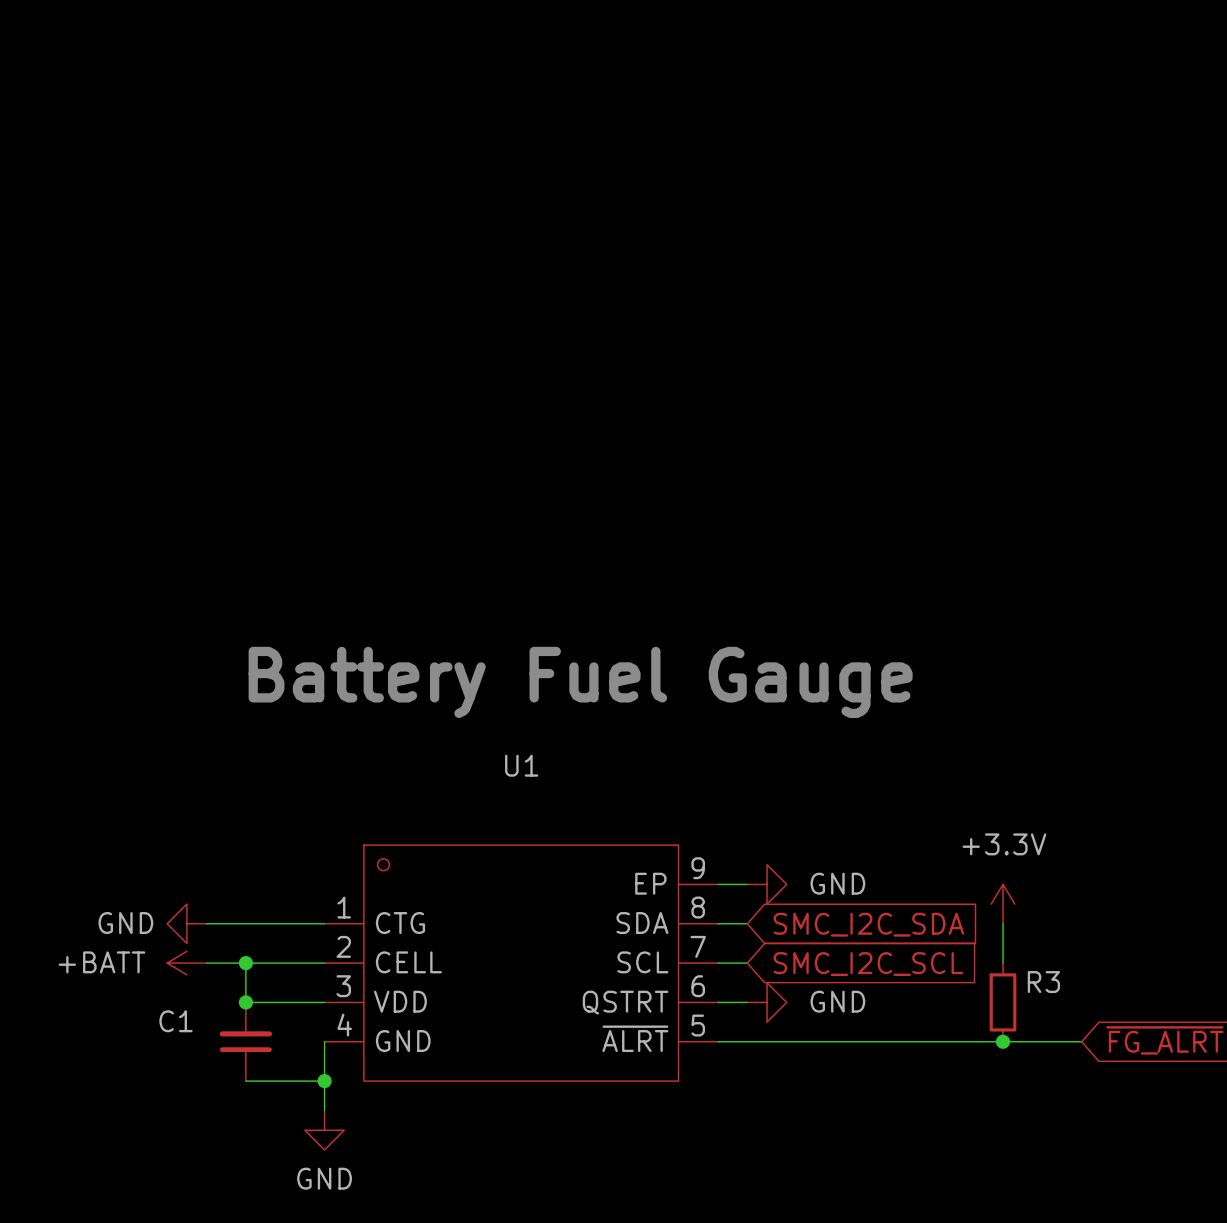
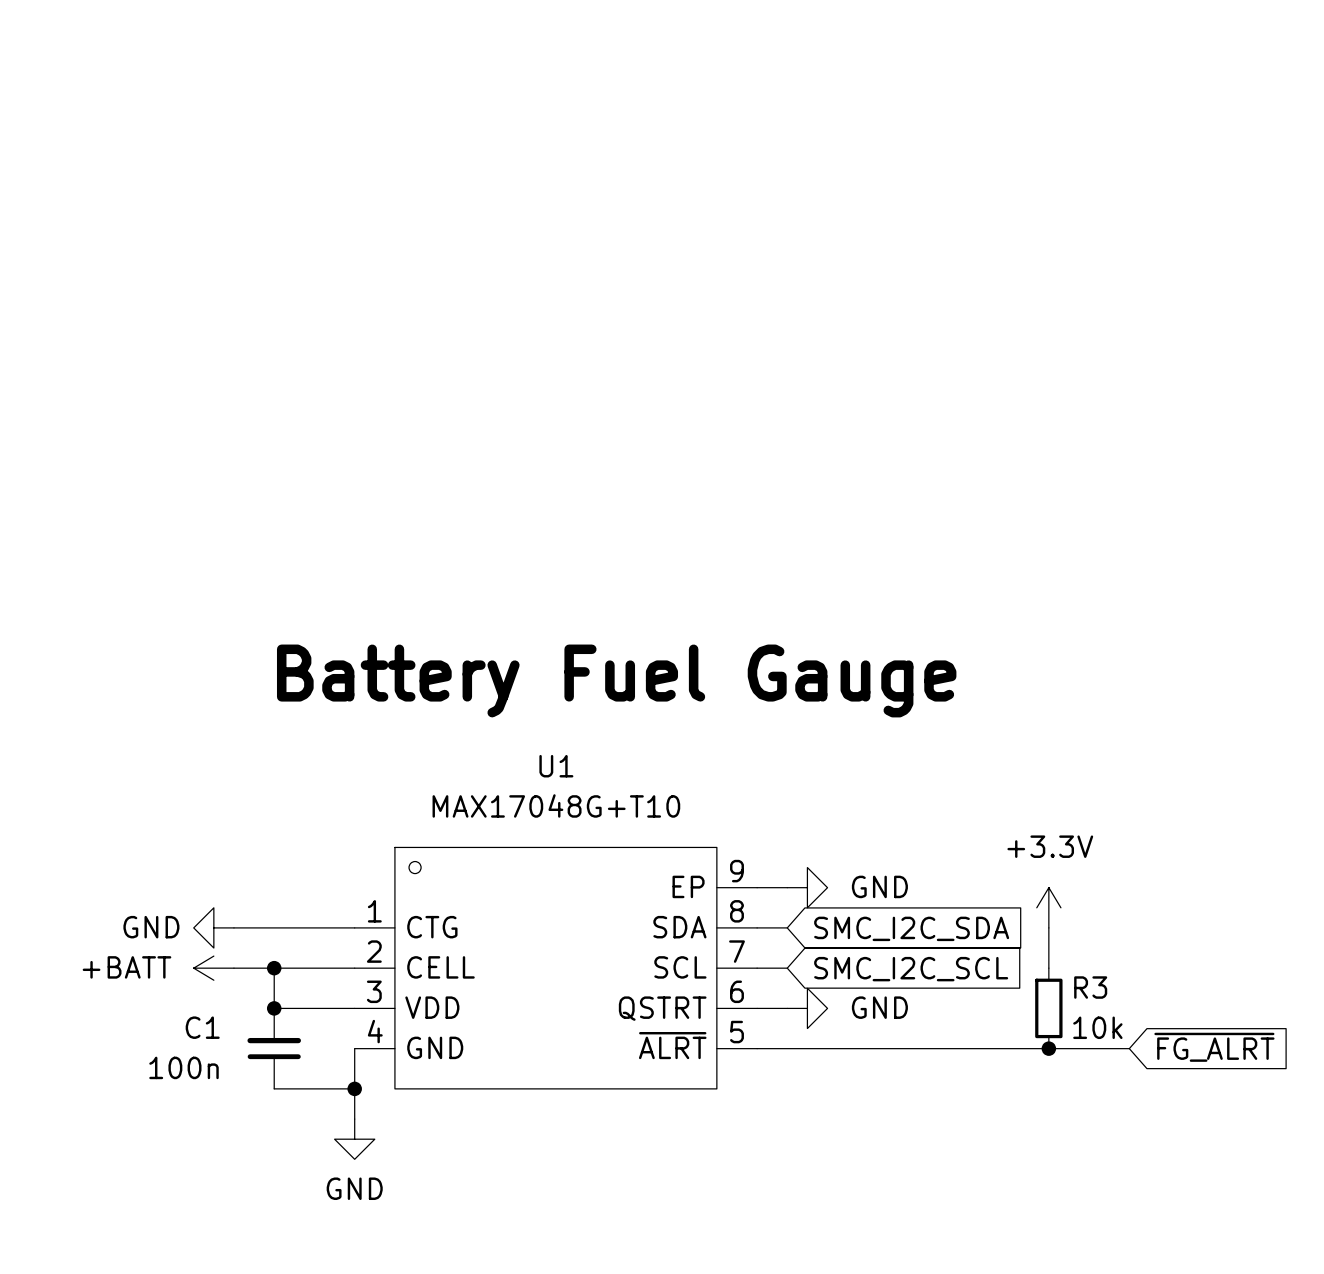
U1 value: none -> MAX17048G+T10 (556, 805)
R3 value: none -> 10k (1097, 1027)
C1 value: none -> 100n (184, 1067)

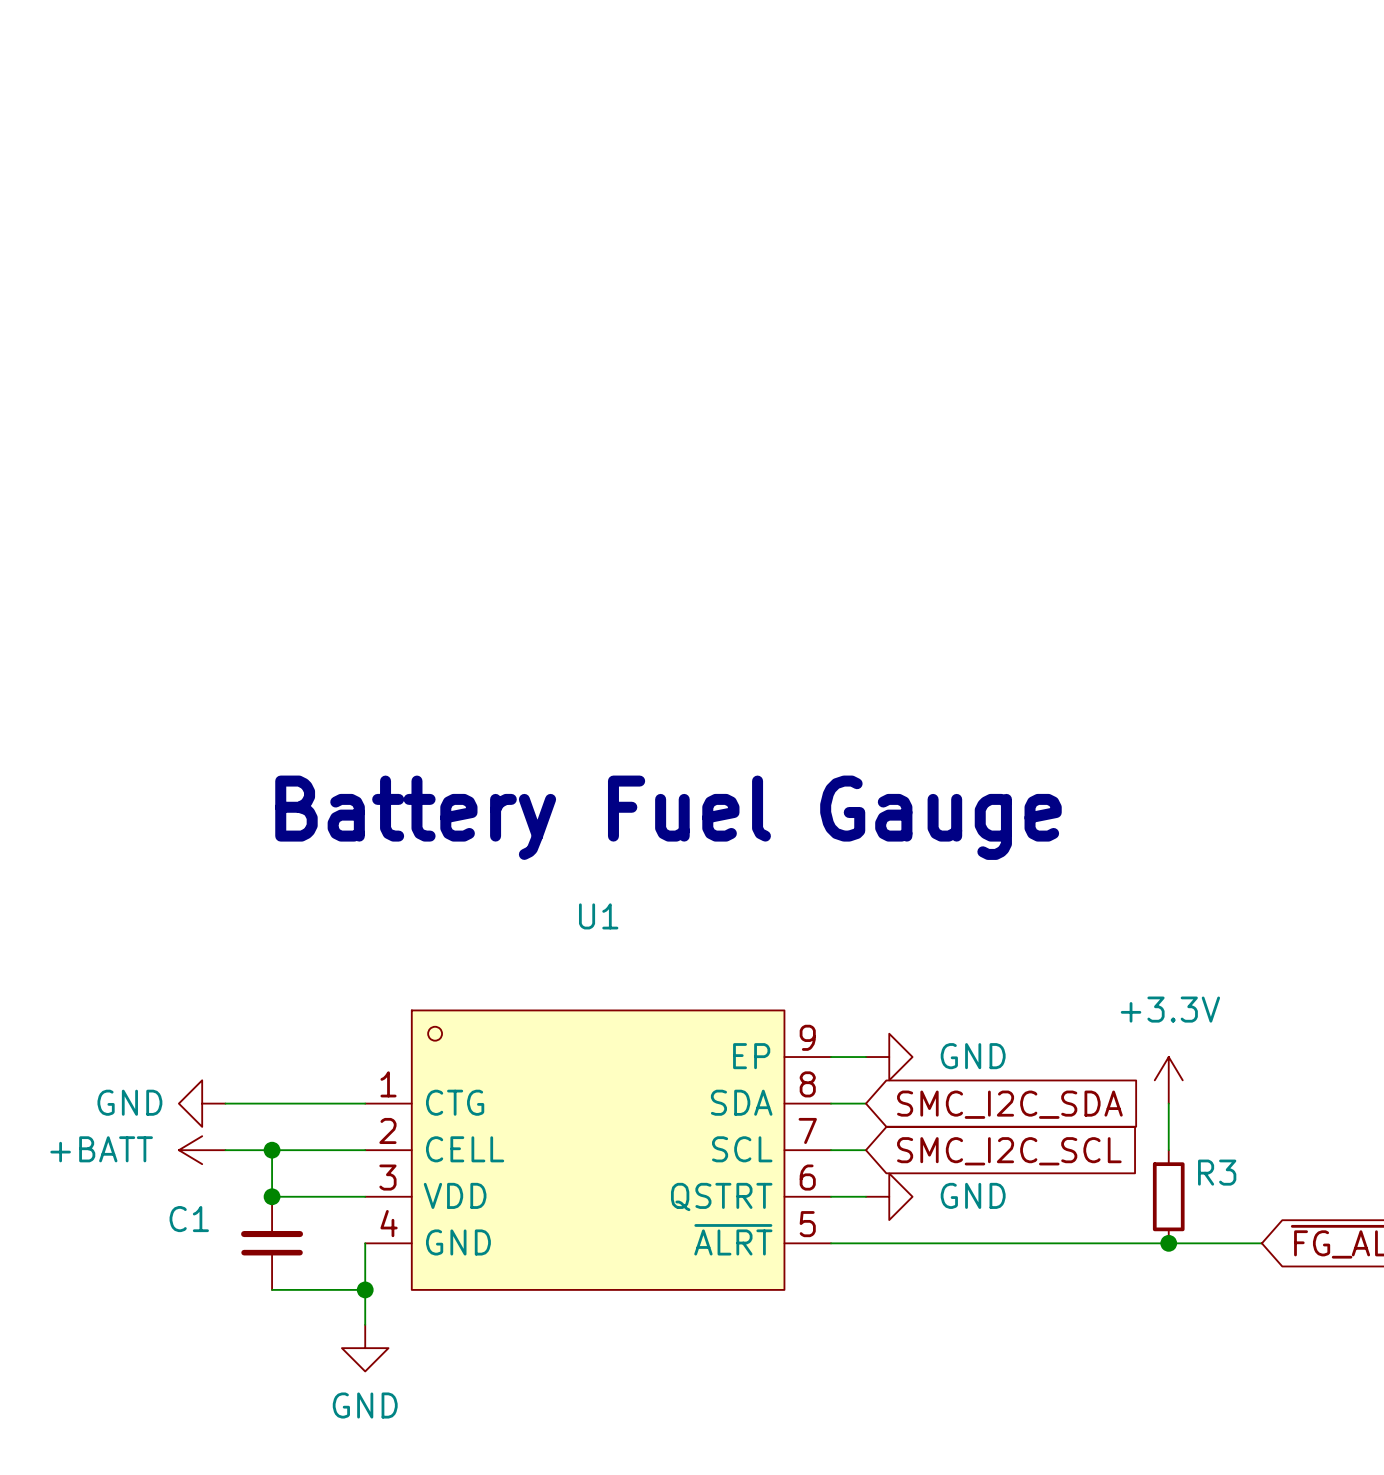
U1 value: MAX17048G+T10 (556, 805) -> none
R3 value: 10k (1097, 1027) -> none
C1 value: 100n (184, 1067) -> none

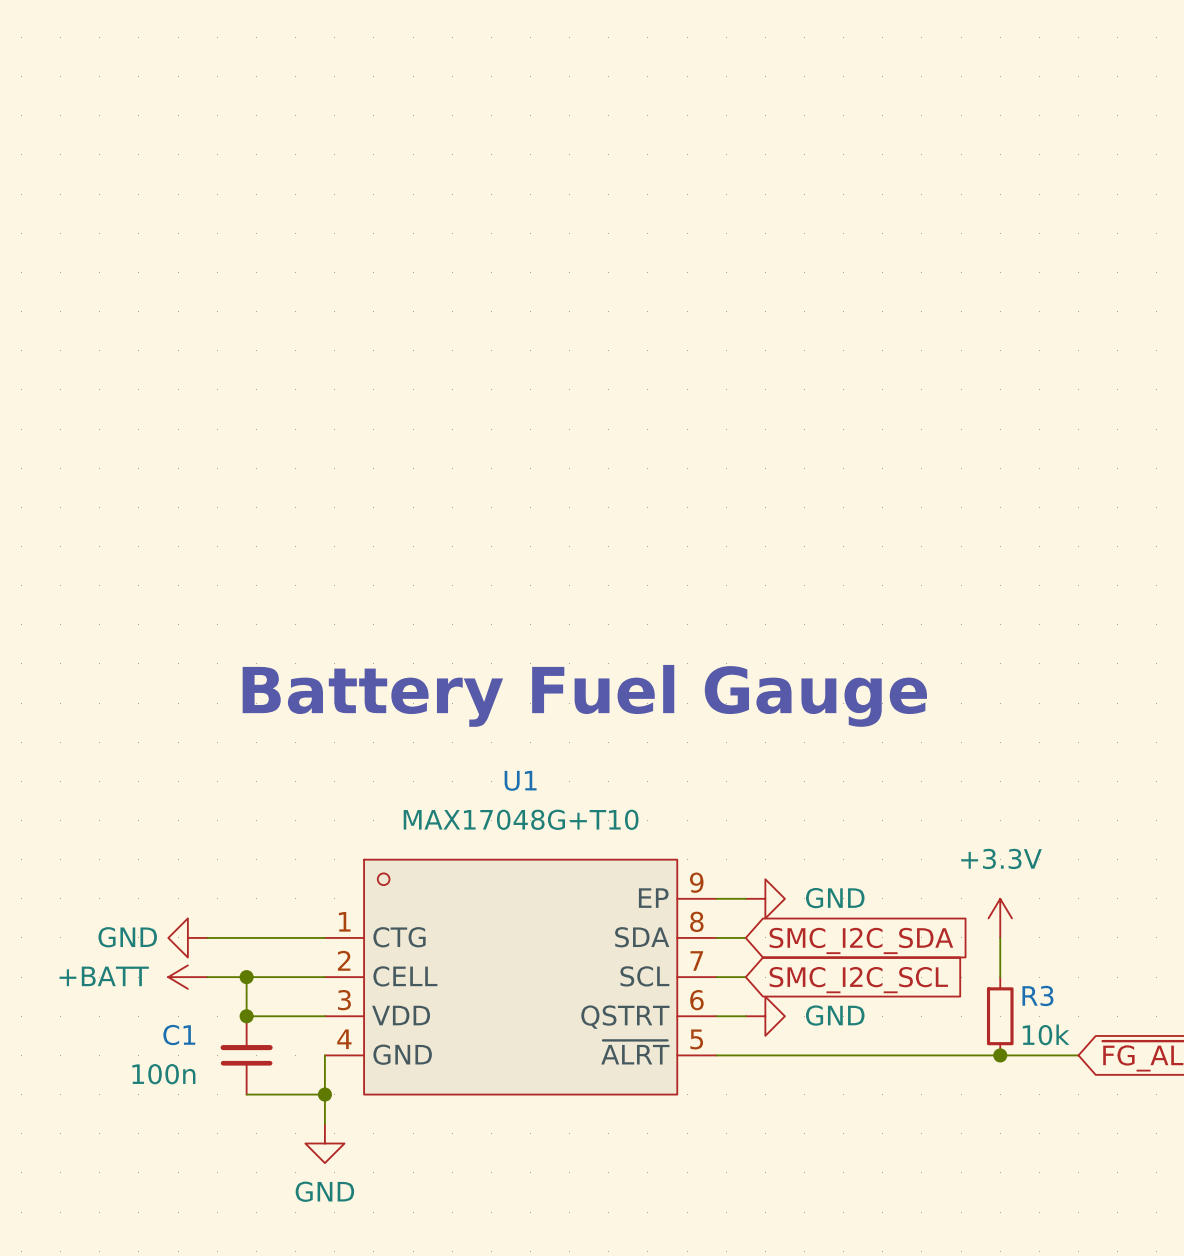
U1 value: none -> MAX17048G+T10 (521, 819)
R3 value: none -> 10k (1046, 1034)
C1 value: none -> 100n (163, 1074)

